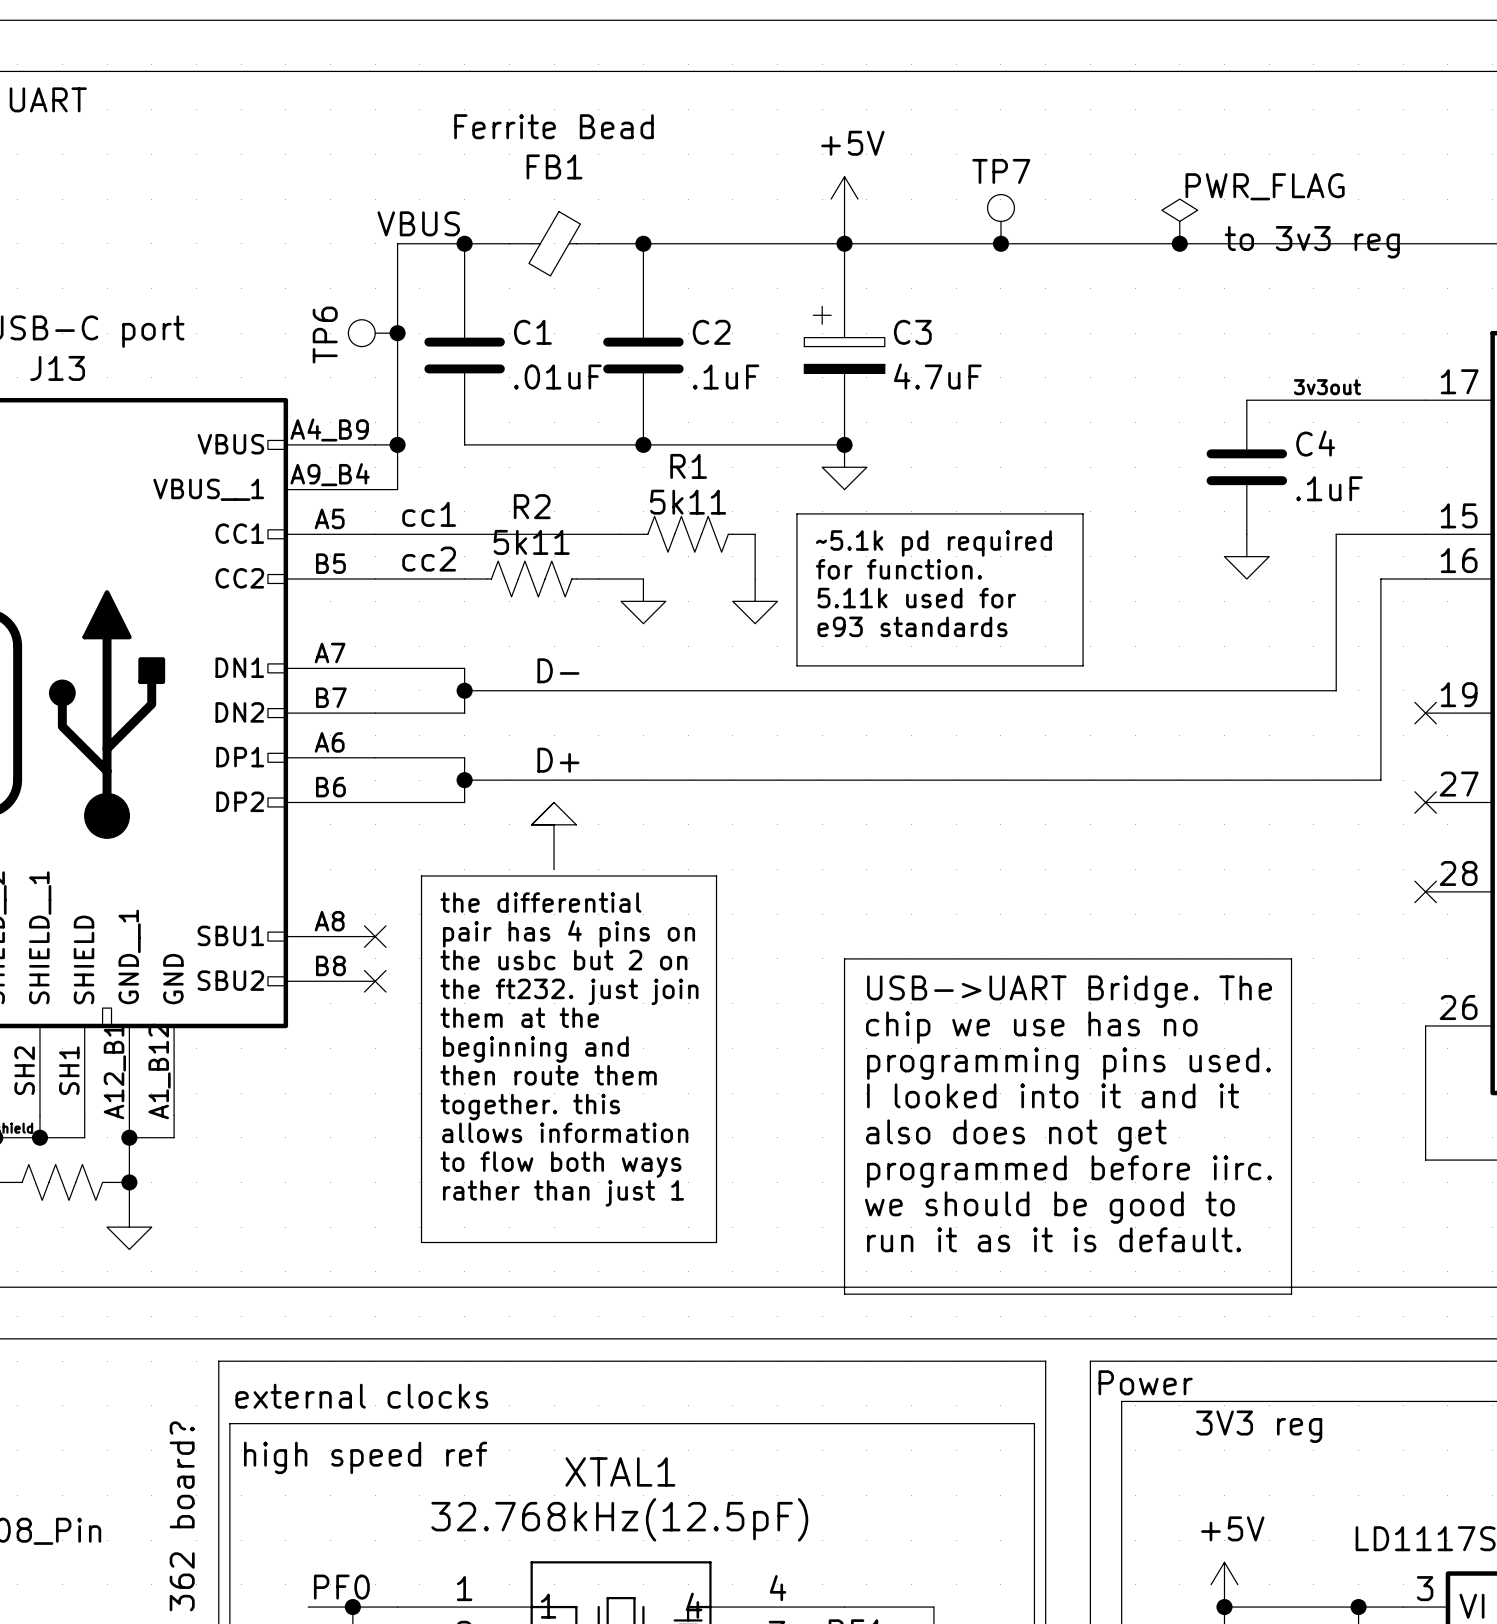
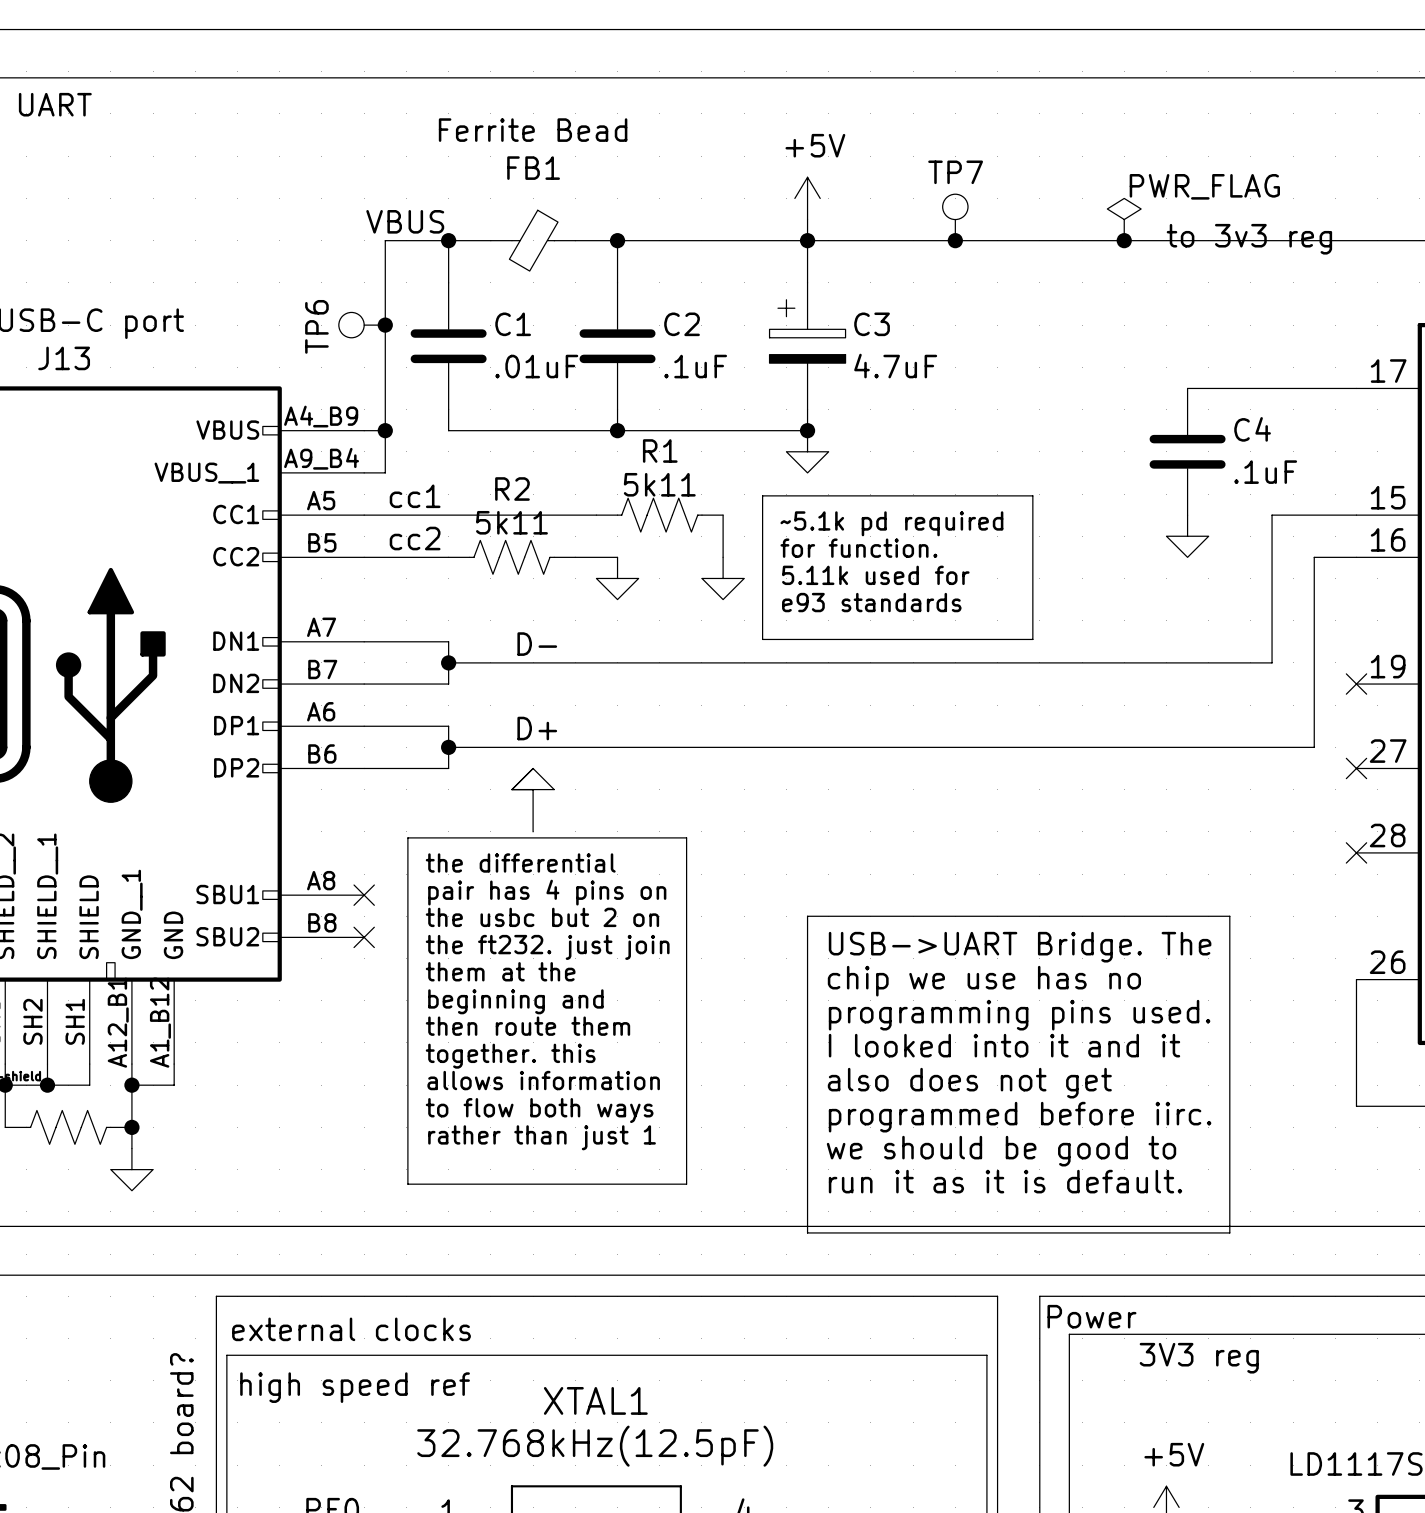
label: 3v3out (1327, 387) -> none

